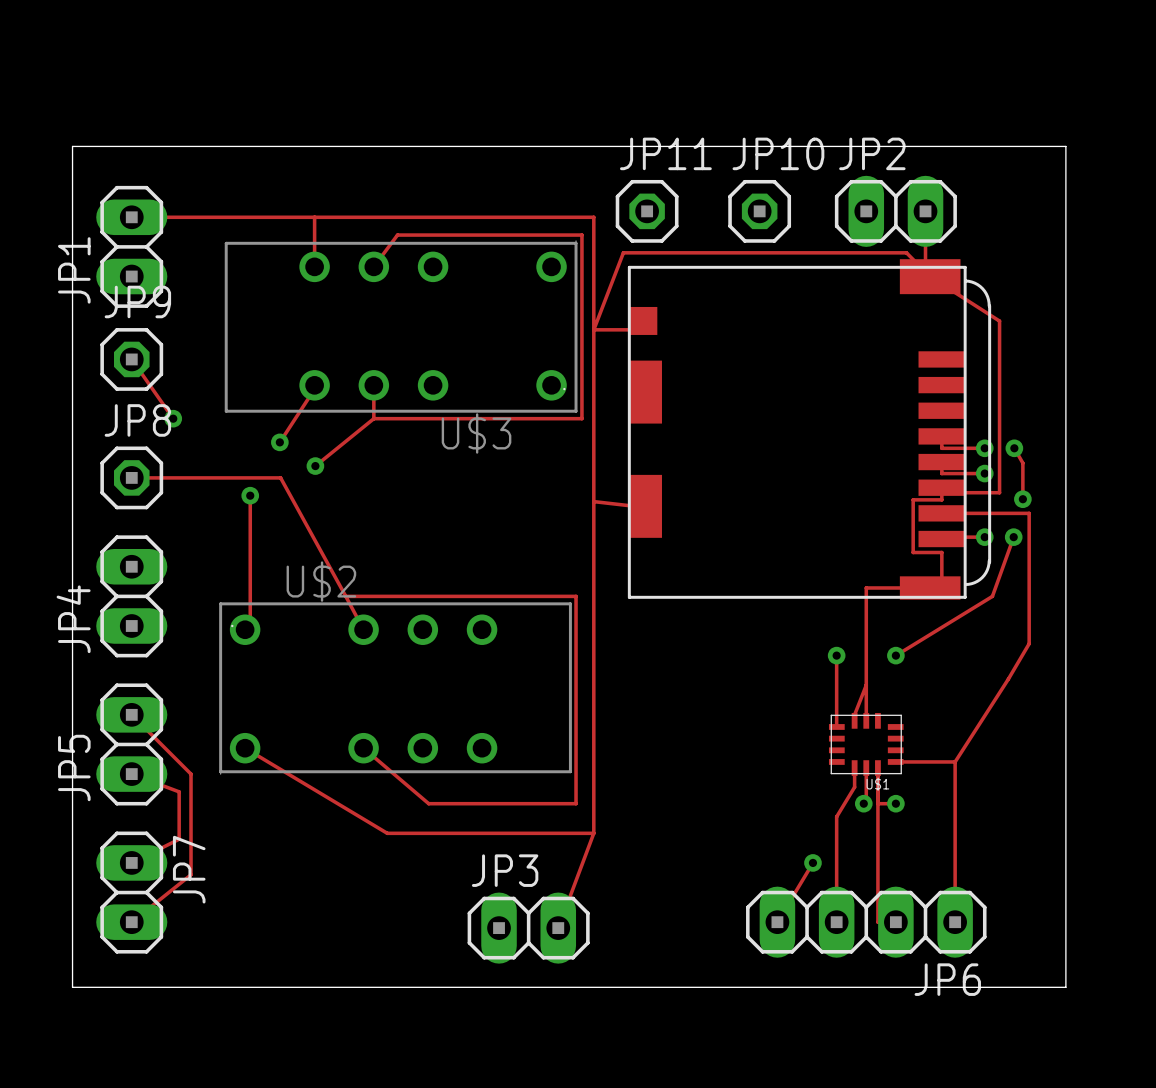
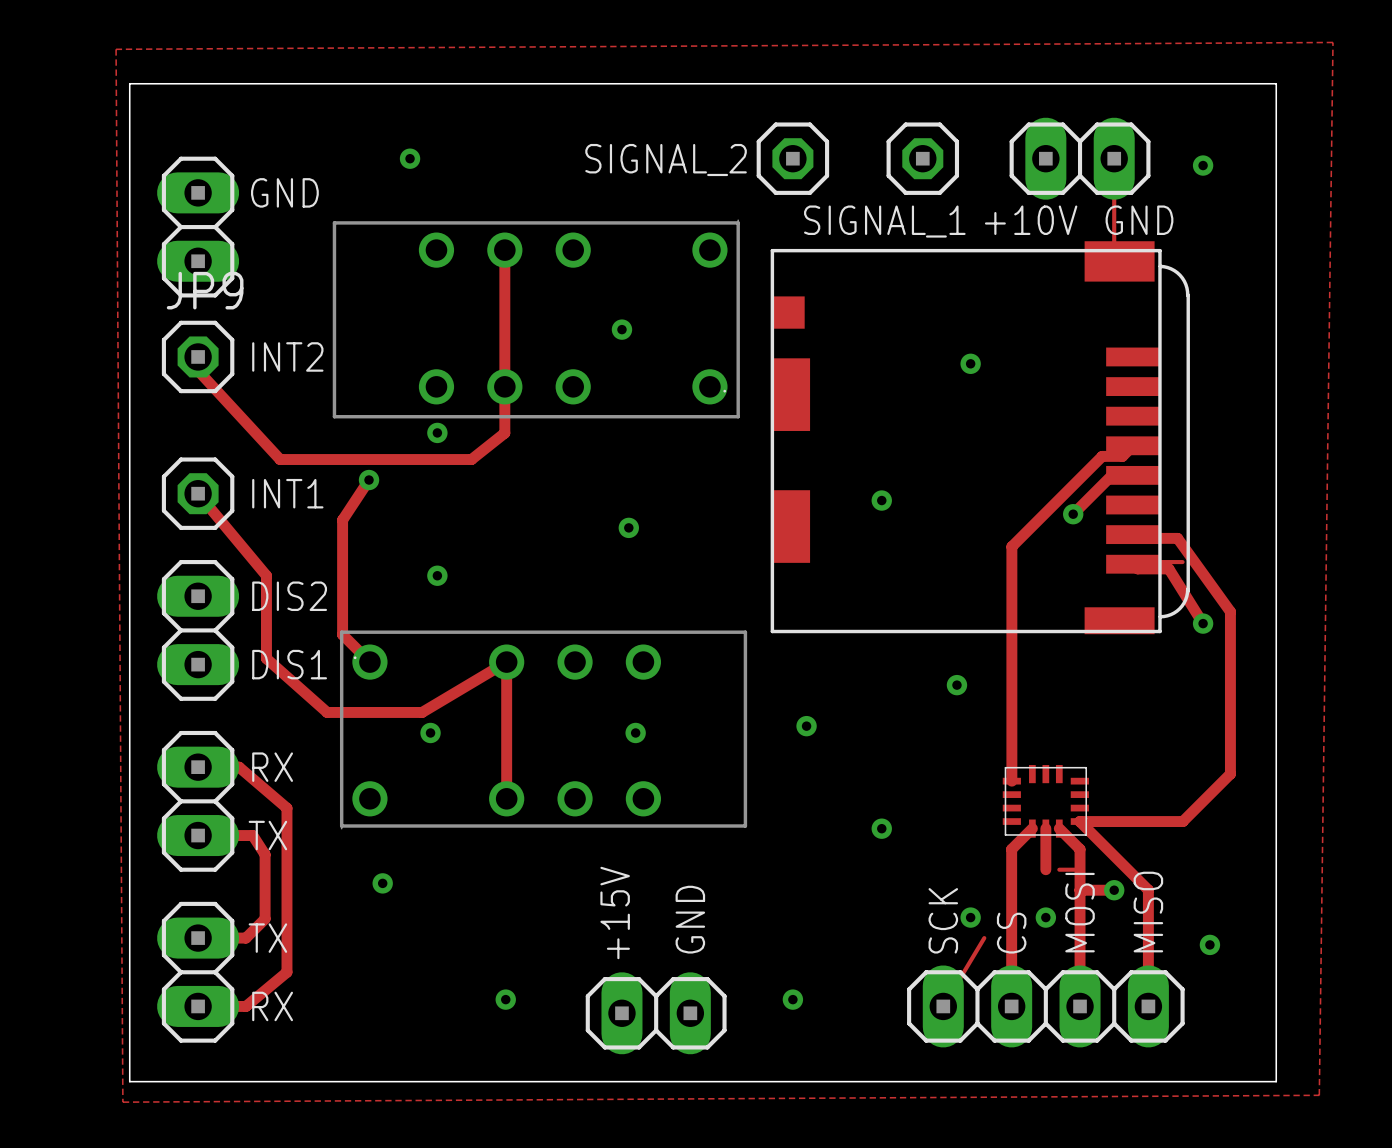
zone outline: none -> (1332, 42) (1319, 1095) (122, 1102) (116, 49) (1332, 42)
board edge: (72, 146) (1065, 146) -> (129, 111) (129, 83) (1276, 83) (1276, 111)
via: none -> (410, 158)
part: none -> (792, 158)
part: none -> (922, 158)
part: none -> (1080, 158)
text: none -> SIGNAL_2 (666, 160)
via: none -> (1203, 165)
JP11: (647, 211) -> none
JP10: (759, 211) -> none
JP2: (895, 211) -> none
track: (131, 217) (593, 217) (593, 833) -> none
text: none -> GND (284, 192)
track: (314, 217) (314, 266) -> none
text: none -> +10V (1031, 220)
text: none -> GND (1139, 220)
text: none -> SIGNAL_1 (884, 221)
track: (373, 266) (397, 235) (581, 235) (581, 418) (373, 418) -> none
JP1 name: JP1 (74, 270) -> none
U$3: (401, 326) -> none
part: none -> (536, 319)
track: (643, 329) (593, 329) (623, 252) (906, 252) (930, 276) (999, 321) (999, 492) (941, 492) -> none
via: none -> (621, 329)
track: (131, 359) (173, 418) -> (198, 356) (198, 370) (280, 459) (471, 459) (504, 433) (504, 250)
text: none -> INT2 (287, 356)
via: none -> (970, 363)
track: (314, 385) (314, 389) (279, 442) -> none
track: (373, 385) (373, 418) -> none
via: (173, 418) -> none
track: (373, 418) (315, 466) -> none
JP8 name: JP8 (137, 420) -> none
via: none -> (437, 432)
track: (941, 436) (941, 448) (984, 448) -> (1133, 445) (1122, 456) (1102, 456) (1011, 546) (1011, 698)
via: (279, 442) -> none
via: (984, 448) -> none
track: (1014, 448) (1022, 463) (1022, 499) -> none
via: (1014, 448) -> none
track: (941, 462) (941, 473) (984, 473) -> (1133, 475) (1112, 475) (1073, 514)
track: none -> (369, 480) (342, 520) (342, 634) (369, 662)
via: none -> (369, 480)
via: (315, 466) -> none
via: (984, 473) -> none
track: (131, 477) (280, 477) (345, 596) -> (198, 493) (266, 575) (266, 658) (327, 712) (422, 712) (506, 662) (506, 798)
text: none -> INT1 (287, 493)
via: none -> (881, 500)
track: (941, 487) (941, 499) (913, 499) (913, 552) (941, 552) (941, 587) -> none
track: (250, 495) (250, 629) (245, 629) -> none
via: (250, 495) -> none
via: none -> (1073, 514)
via: (1022, 499) -> none
track: (593, 501) (645, 507) -> none
via: none -> (628, 527)
track: (941, 513) (1029, 513) (1029, 643) (955, 761) (955, 821) -> (1133, 534) (1136, 538) (1177, 538) (1230, 611) (1230, 774) (1182, 821) (1148, 821)
via: (984, 537) -> none
track: (1013, 537) (992, 596) (895, 655) -> none
via: (1013, 537) -> none
track: none -> (1143, 564) (1133, 564) (1137, 568) (1168, 568) (1203, 623)
via: none -> (437, 575)
text: none -> DIS2 (289, 596)
track: (930, 587) (866, 587) (866, 720) -> none
via: none -> (1203, 623)
track: (345, 596) (363, 629) -> none
track: (345, 596) (576, 596) (576, 803) (428, 803) (363, 748) -> none
JP4 name: JP4 (73, 619) -> none
text: none -> DIS1 (289, 664)
track width: thin (836, 655) (836, 726) -> thick (1011, 698) (1011, 781)
via position: (836, 655) -> (956, 685)
via: (895, 655) -> none
via: none -> (806, 726)
part: none -> (543, 729)
via: none -> (430, 732)
via: none -> (635, 732)
track: (866, 685) (854, 714) -> none
U$2: (395, 688) -> none
track: (131, 714) (191, 774) (191, 874) (131, 922) -> (198, 767) (239, 767) (286, 808) (286, 972) (245, 1006) (198, 1006)
text: none -> RX (272, 767)
track: (245, 748) (387, 833) (593, 833) -> none
track: none -> (1079, 821) (1148, 890)
track width: thin (895, 761) (955, 761) -> thick (1079, 821) (1148, 821)
JP5 name: JP5 (74, 767) -> none
via: none -> (881, 828)
track: (854, 768) (854, 787) (836, 816) -> (1032, 828) (1011, 849) (1011, 884)
track width: thin (866, 768) (866, 803) -> thick (1045, 828) (1045, 869)
track: (877, 768) (877, 922) (895, 922) -> (1059, 828) (1080, 849) (1080, 1006)
track: (131, 774) (179, 791) (179, 839) (131, 862) -> (198, 835) (252, 835) (265, 854) (265, 918) (245, 938) (198, 938)
text: none -> TX (267, 835)
U$1 name: U$1 (877, 784) -> none
via: (863, 803) -> none
via: (895, 803) -> none
via: none -> (382, 883)
track width: thin (836, 816) (836, 922) -> thick (1011, 884) (1011, 1006)
track: none -> (1080, 890) (1114, 890)
via: none -> (1114, 890)
track width: thin (955, 821) (955, 922) -> thick (1148, 890) (1148, 1006)
track: (593, 833) (558, 928) -> none
text: none -> MOSI (1080, 912)
text: none -> MISO (1148, 912)
text: none -> +15V (615, 913)
via: none -> (1045, 917)
text: none -> GND (690, 919)
text: none -> SCK (943, 920)
text: none -> CS (1011, 933)
text: none -> TX (267, 938)
via position: (812, 862) -> (970, 917)
via: none -> (1209, 944)
JP7 name: JP7 (189, 869) -> none
JP3 name: JP3 (505, 870) -> none
via: none -> (505, 999)
via: none -> (792, 999)
text: none -> RX (272, 1006)
JP6 name: JP6 (947, 979) -> none

